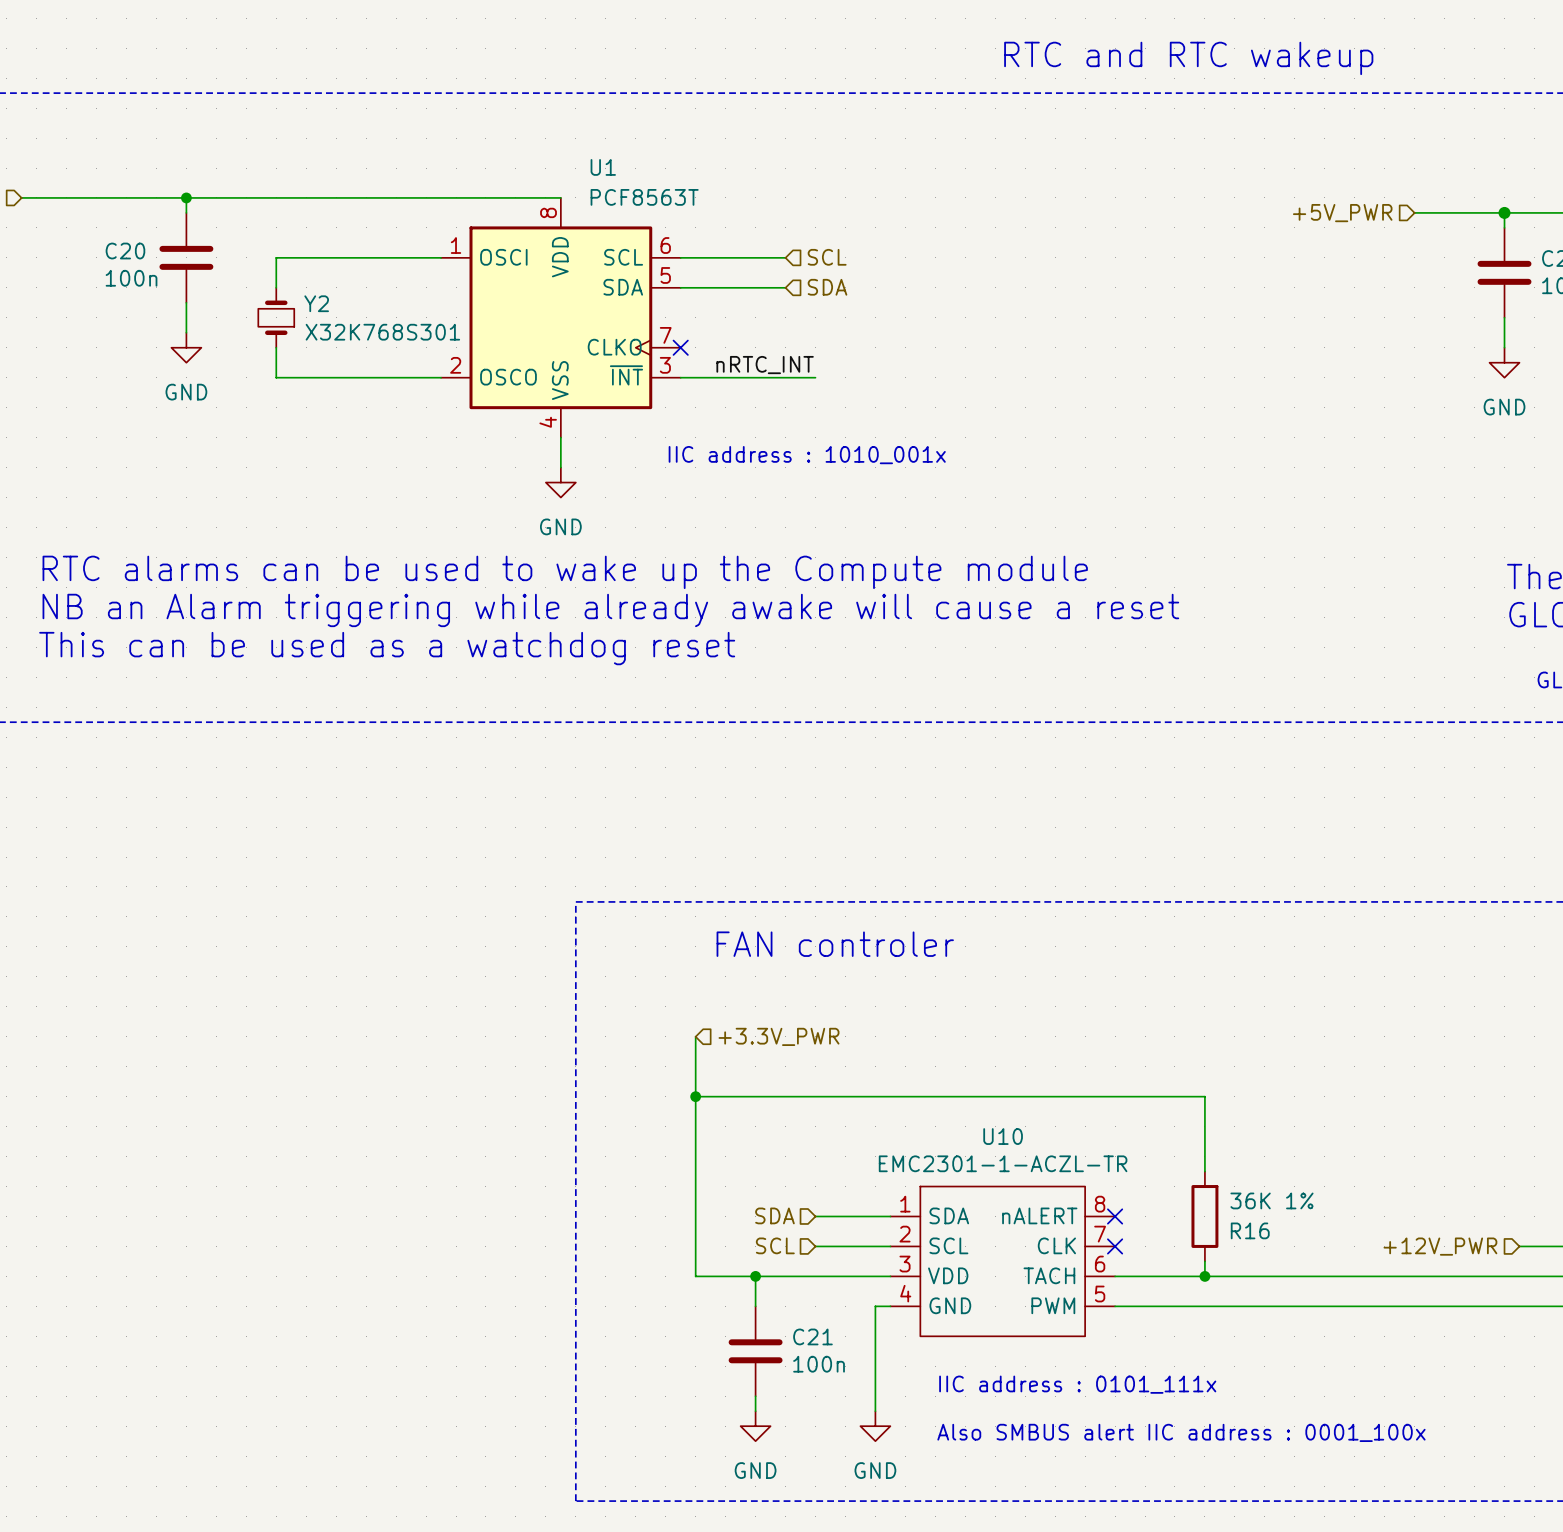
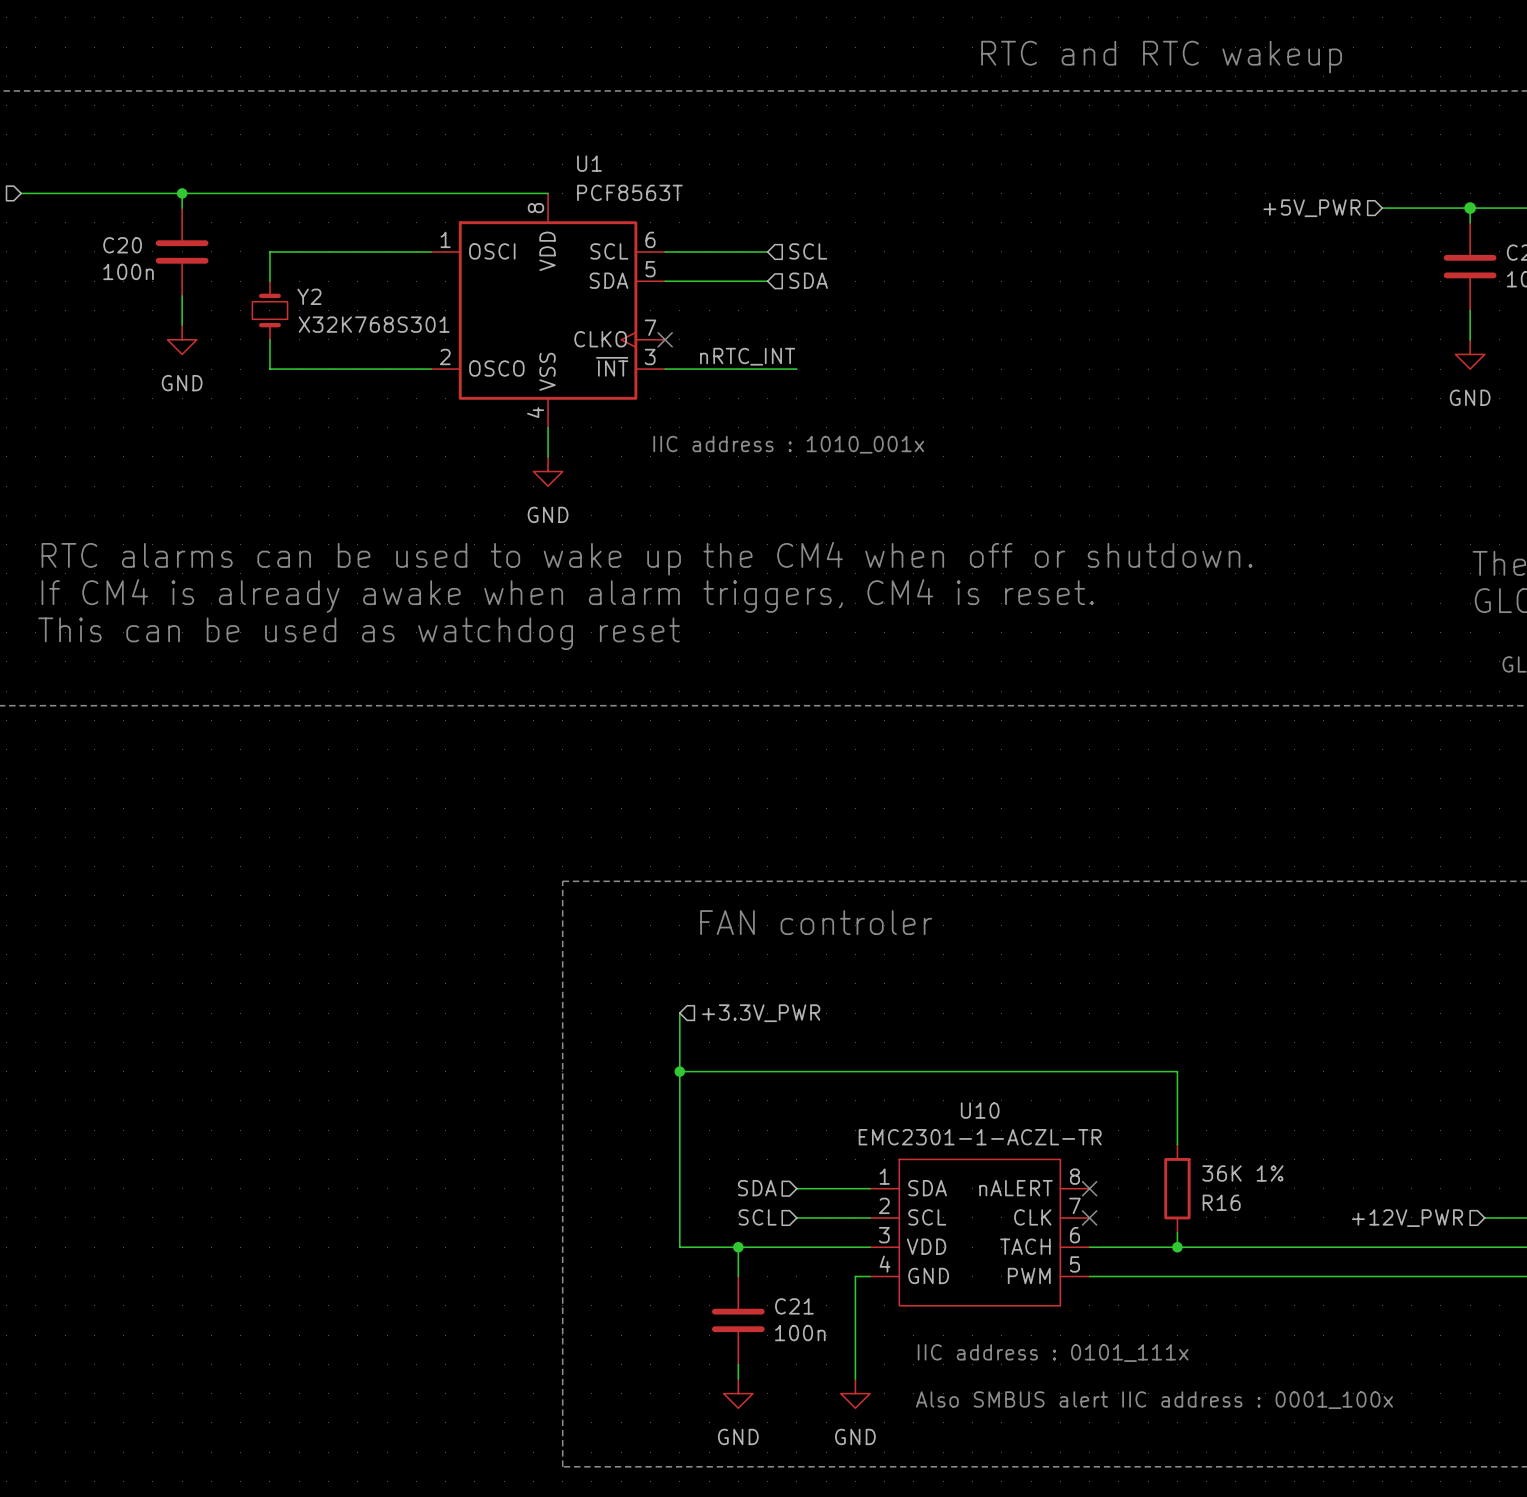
text: RTC alarms can be used to wake up the Compute module (565, 572) -> RTC alarms can be used to wake up the CM4 when off or shutdown. (647, 558)
text: NB an Alarm triggering while already awake will cause a reset (610, 610) -> If CM4 is already awake when alarm triggers, CM4 is reset. (567, 595)
text: This can be used as a watchdog reset (387, 648) -> This can be used as watchdog reset (359, 633)

